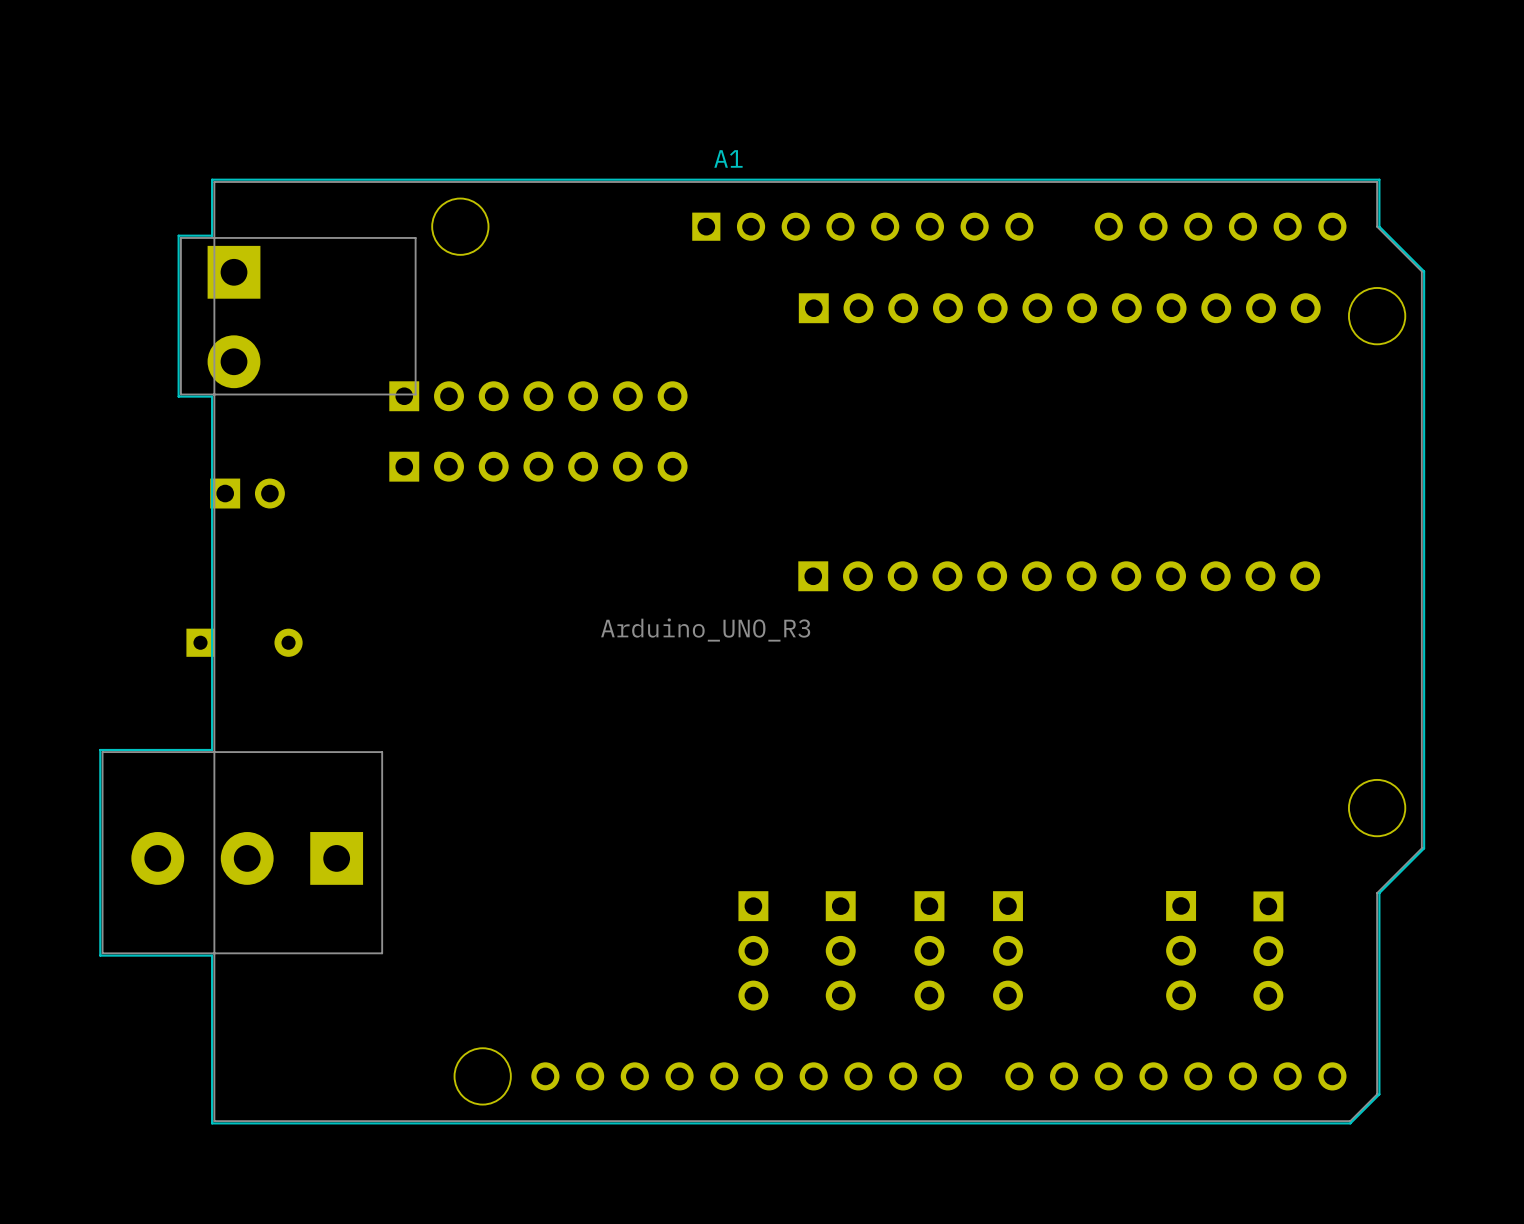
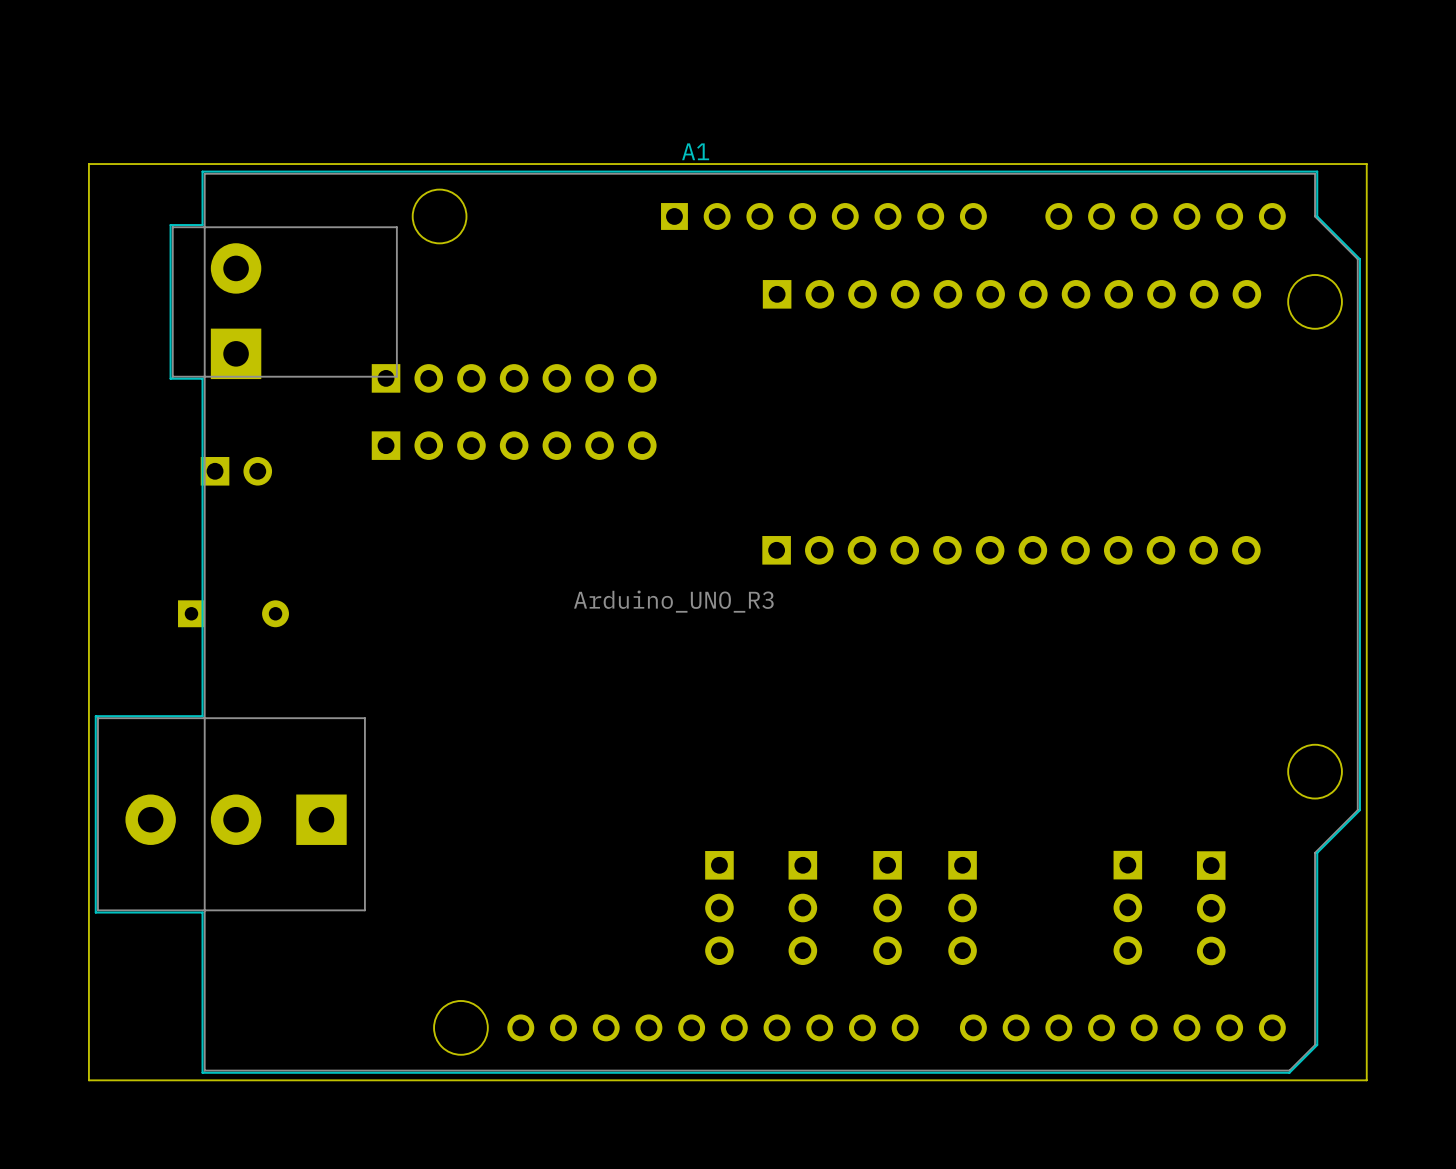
board edge: none -> (1366, 164) (88, 164) (88, 1080) (1366, 1080) (1366, 164)
part rotation: 0° (234, 317) -> 180° (236, 311)

